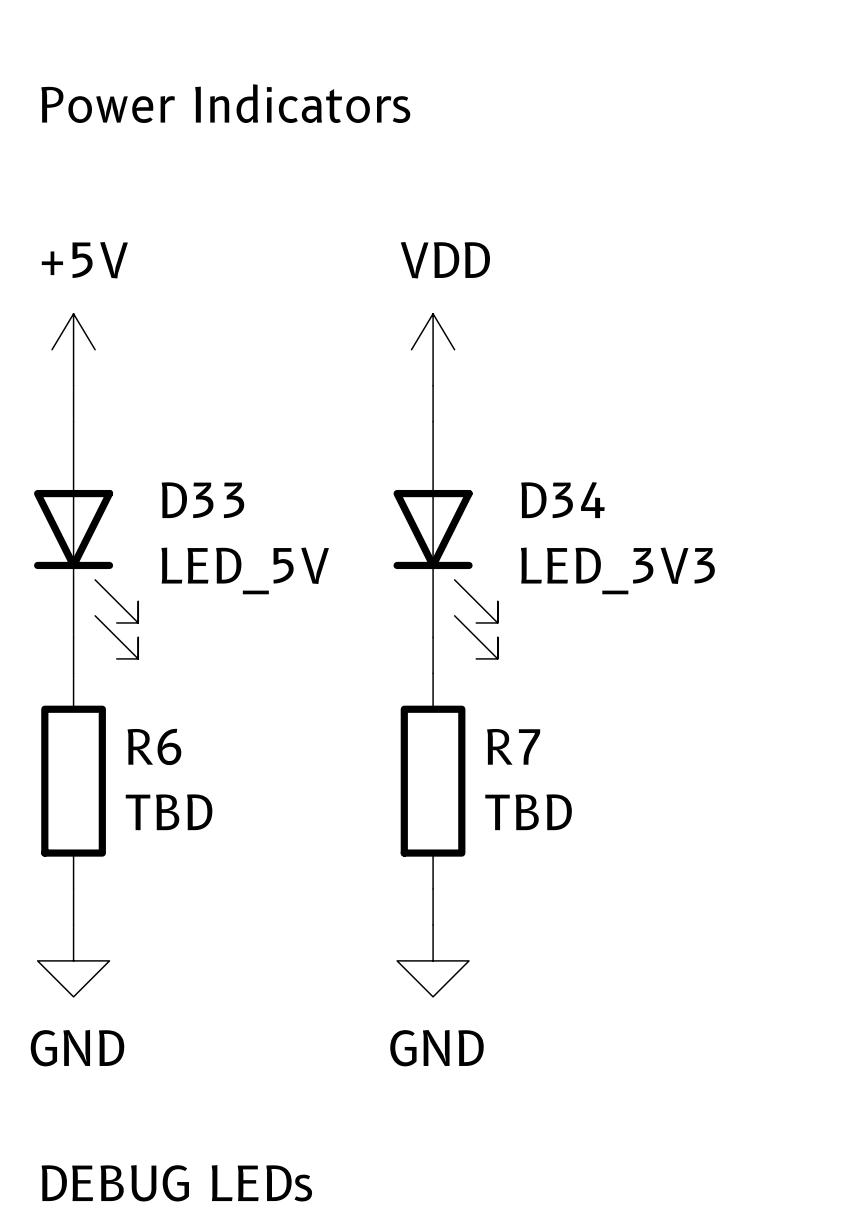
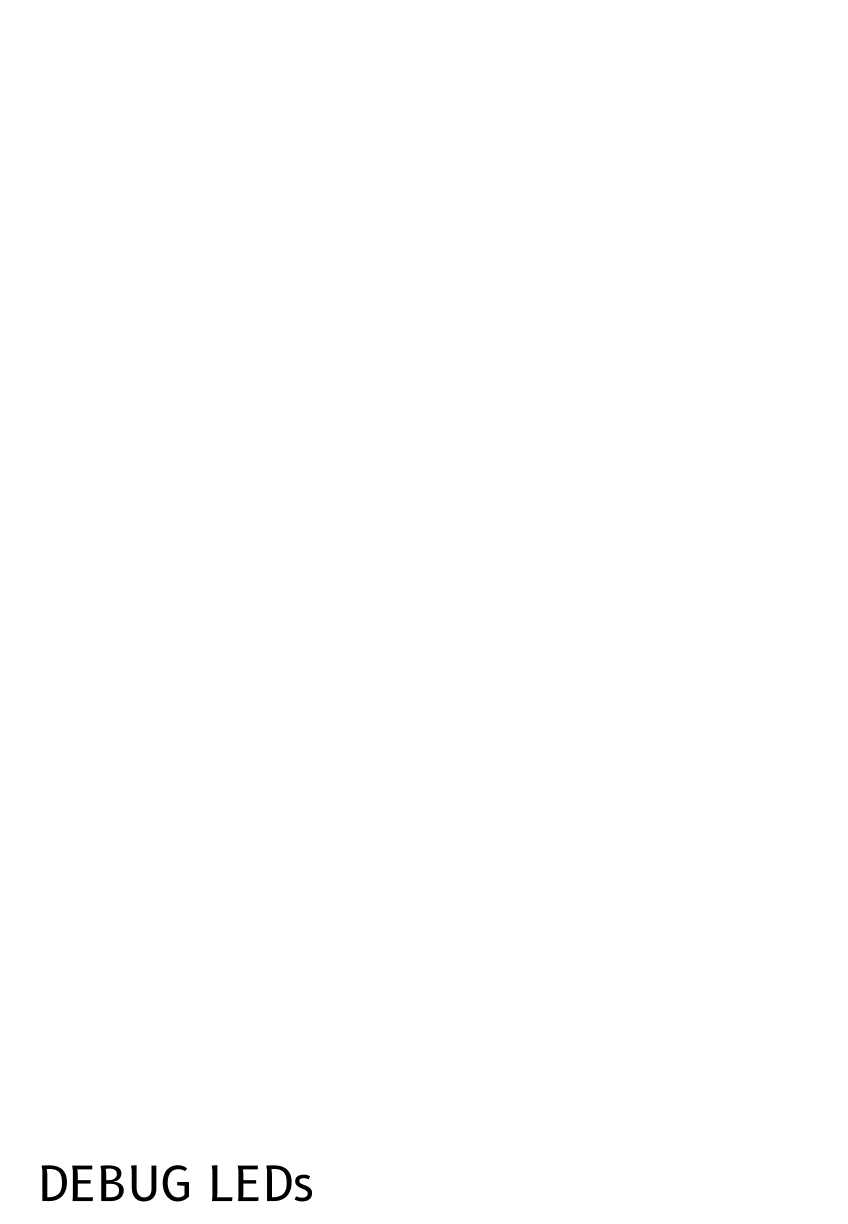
text: Power Indicators (225, 103) -> none
power symbol: +5V (73, 349) -> none
power symbol: VDD (433, 349) -> none
wire: (73, 385) (73, 421) -> none
wire: (433, 385) (433, 421) -> none
D33: LED_5V (86, 540) -> none
D34: LED_3V3 (445, 540) -> none
wire: (73, 637) (73, 673) -> none
wire: (433, 637) (433, 673) -> none
R6: TBD (73, 781) -> none
R7: TBD (433, 781) -> none
wire: (73, 889) (73, 924) -> none
wire: (433, 889) (433, 924) -> none
power symbol: GND (73, 960) -> none
power symbol: GND (433, 960) -> none

